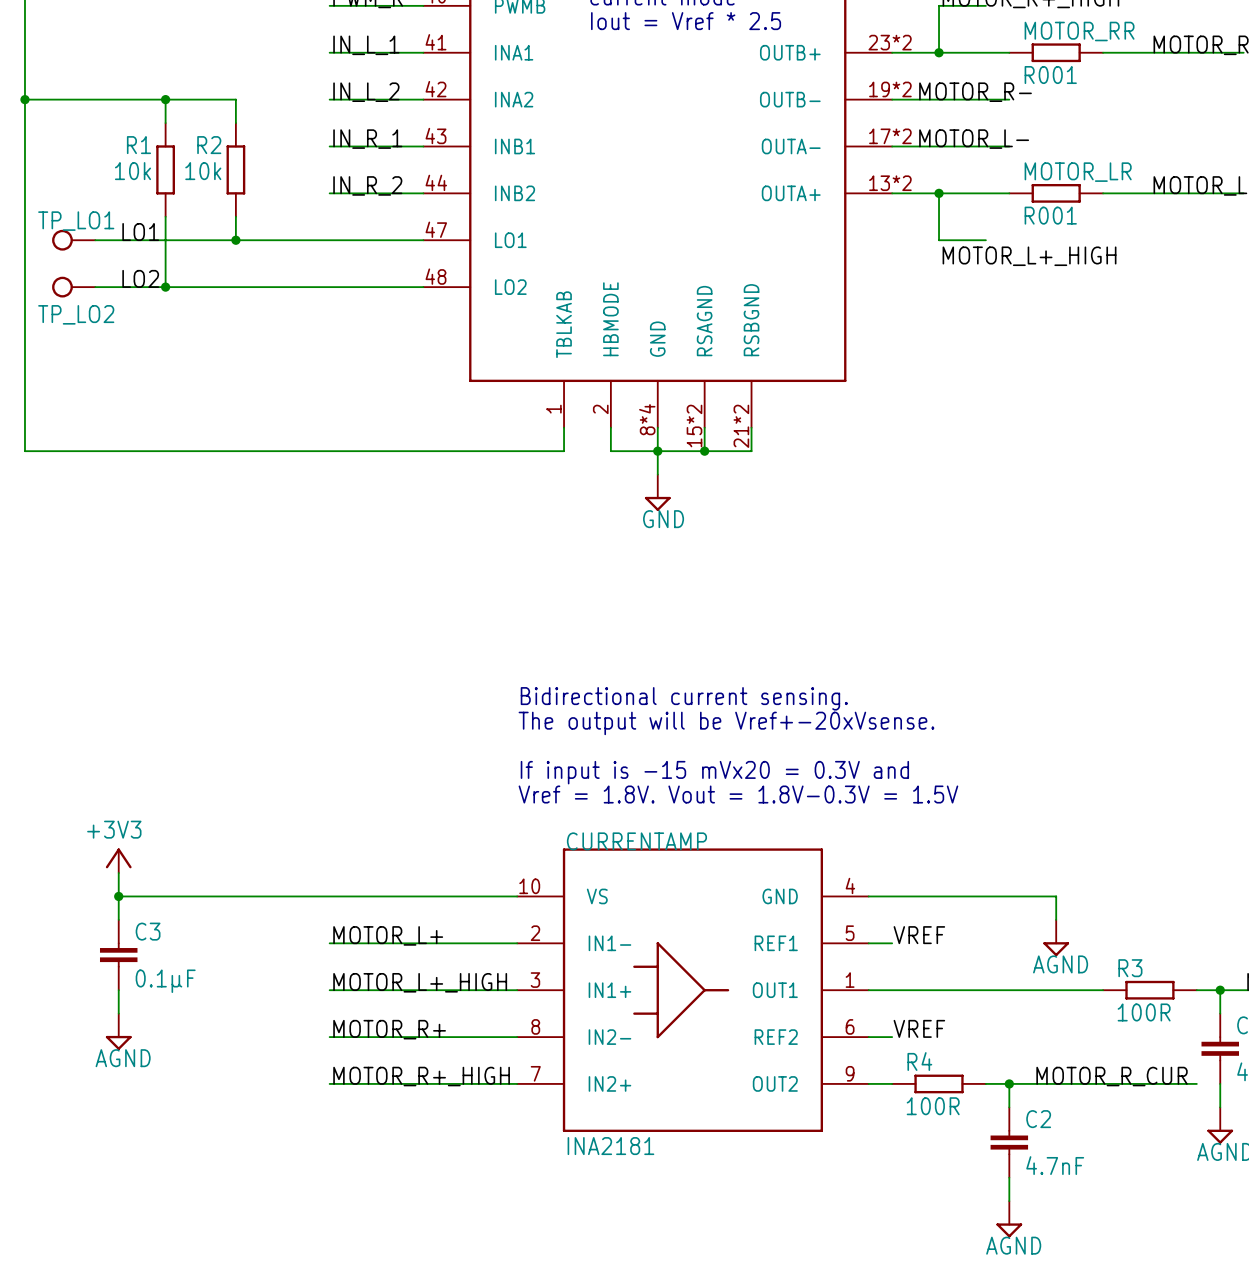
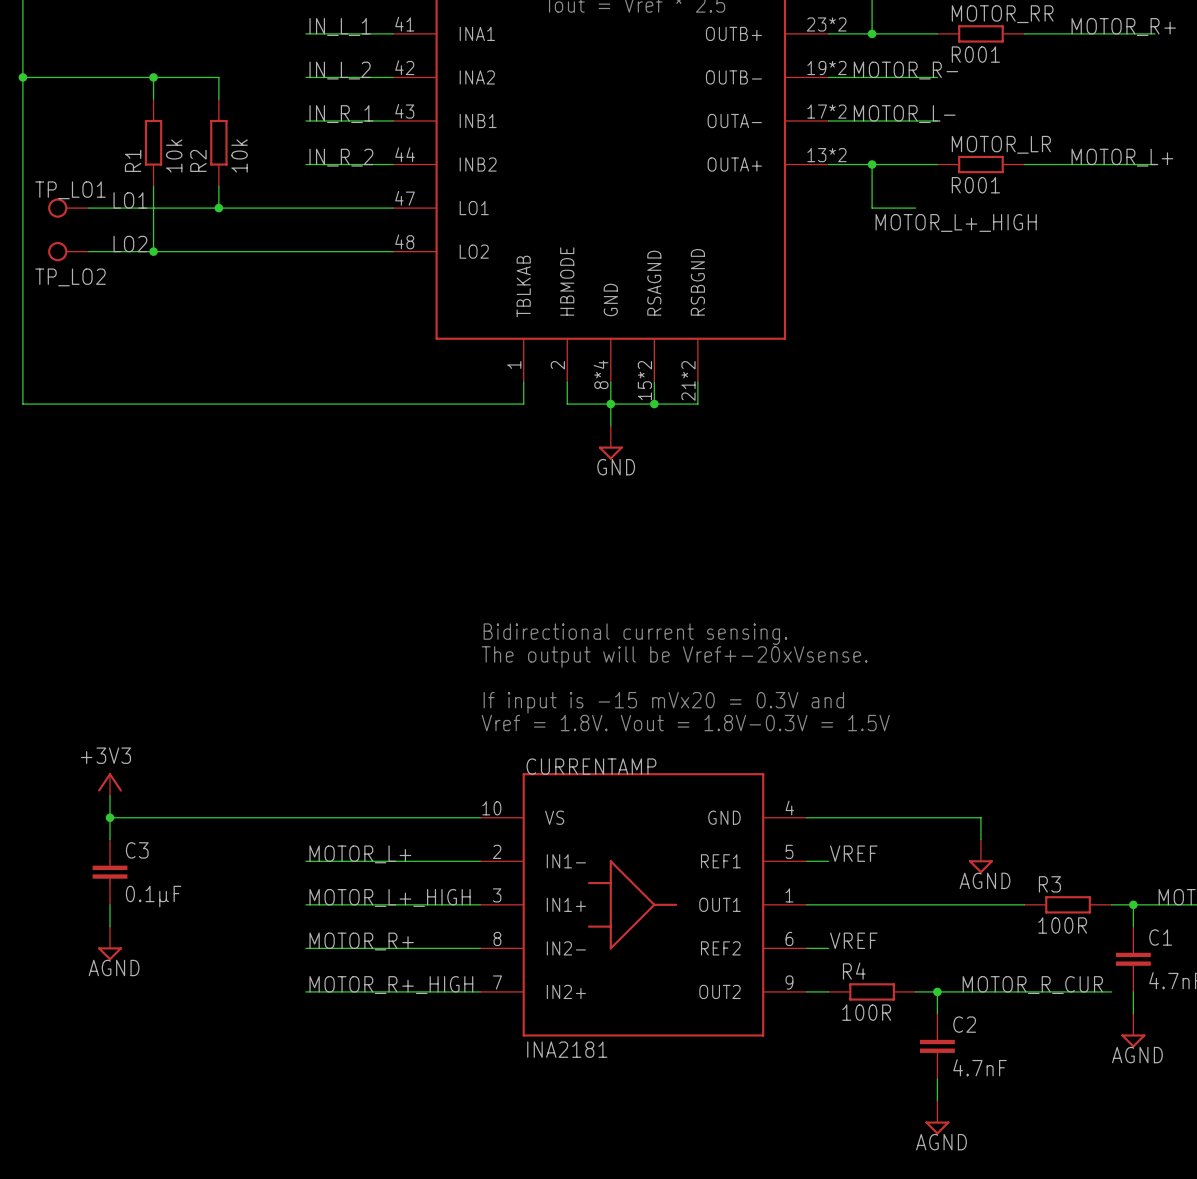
R1 name rotation: 0° (138, 145) -> 90° counterclockwise (133, 160)
R1 name position: R1 (138, 145) -> R1 (133, 160)
R2 name rotation: 0° (209, 145) -> 90° counterclockwise (198, 160)
R2 name position: R2 (209, 145) -> R2 (198, 160)
R1 value rotation: 0° (132, 171) -> 90° counterclockwise (174, 156)
R1 value position: 10k (132, 171) -> 10k (174, 156)
R2 value rotation: 0° (203, 171) -> 90° counterclockwise (239, 156)
R2 value position: 10k (203, 171) -> 10k (239, 156)

